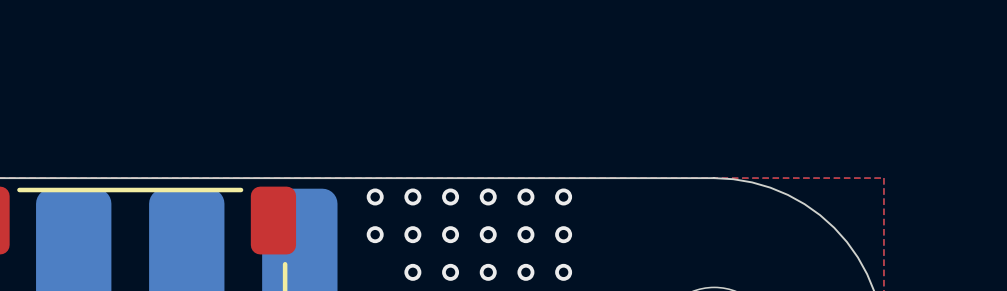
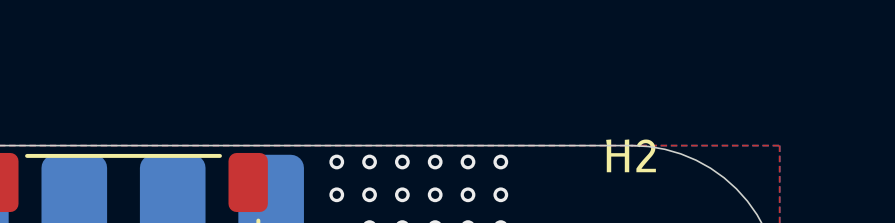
H2 name: none -> H2 (631, 155)

